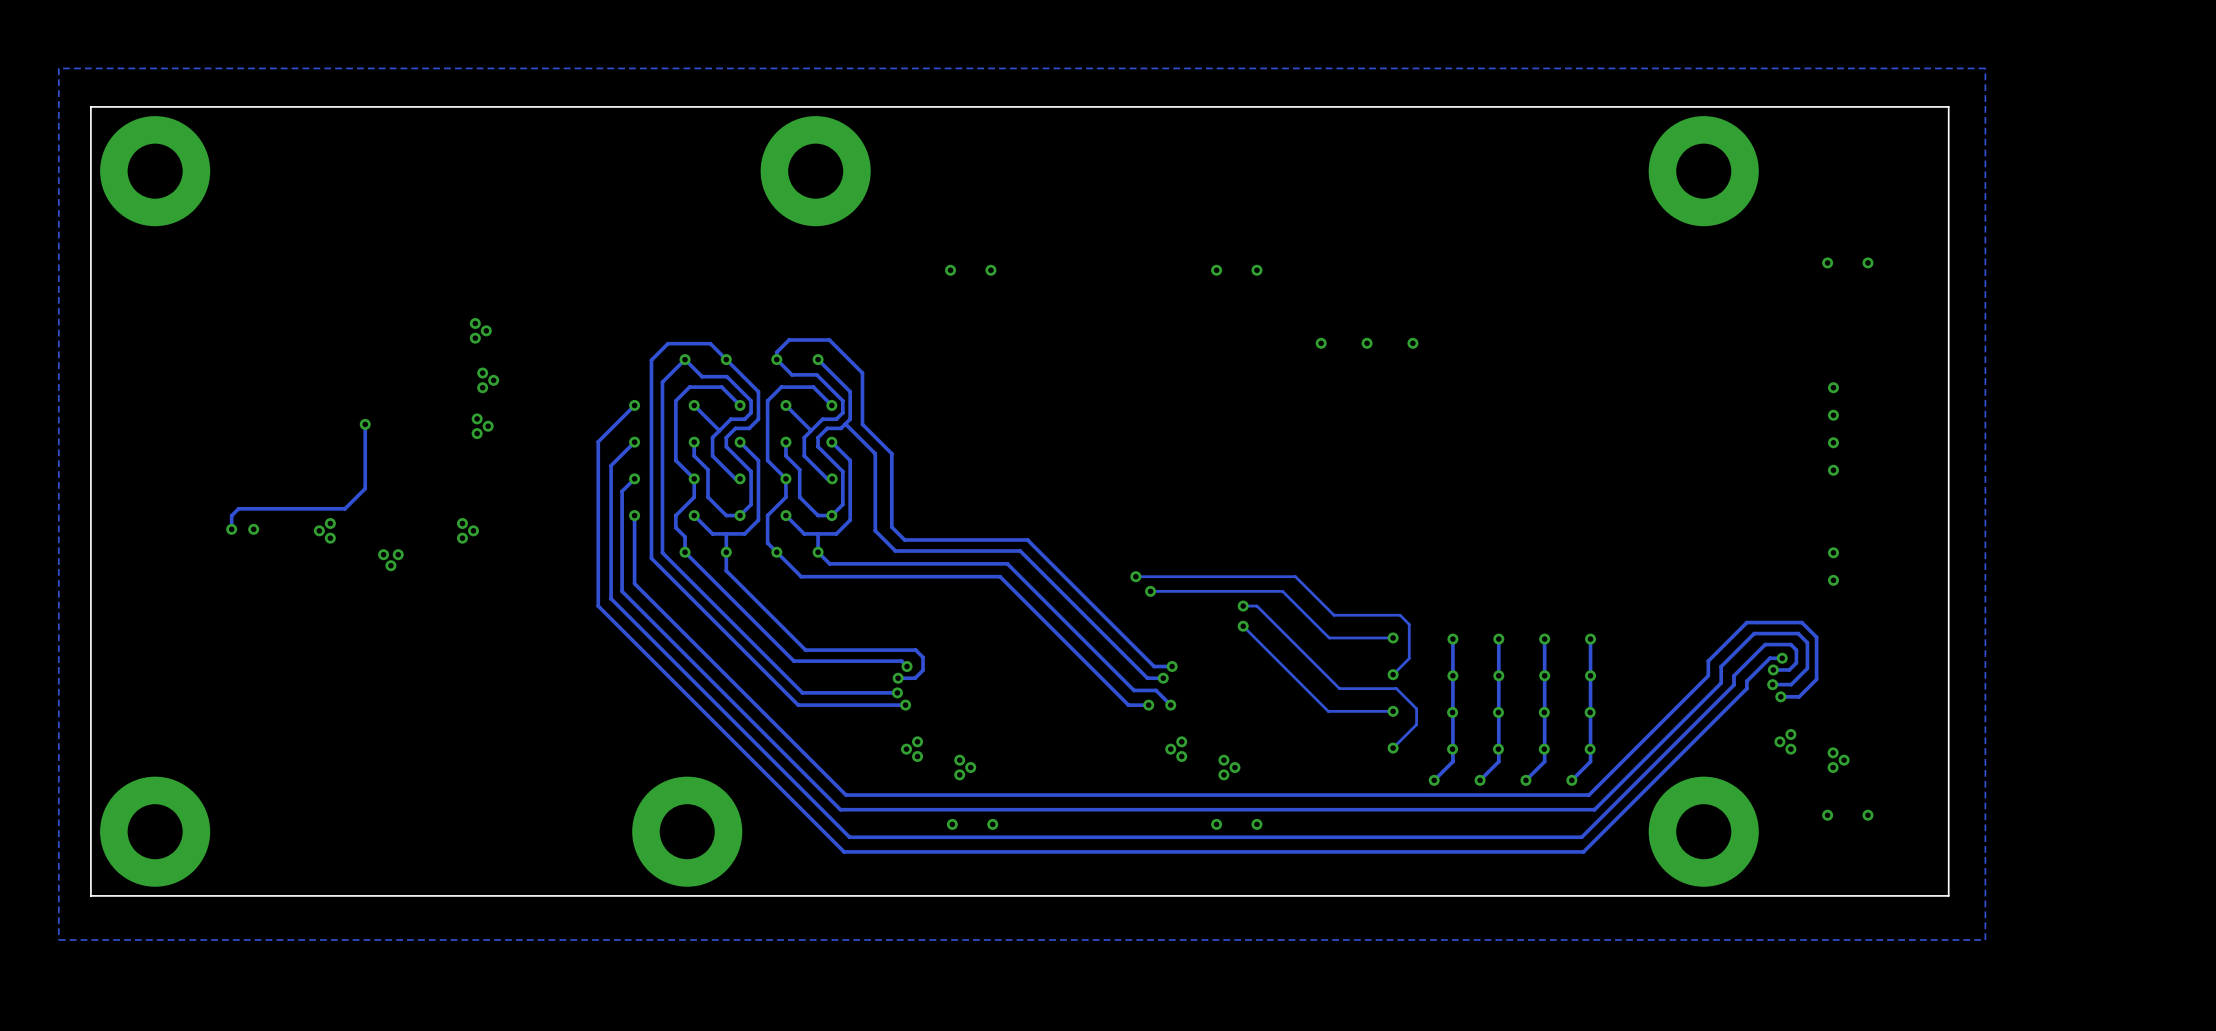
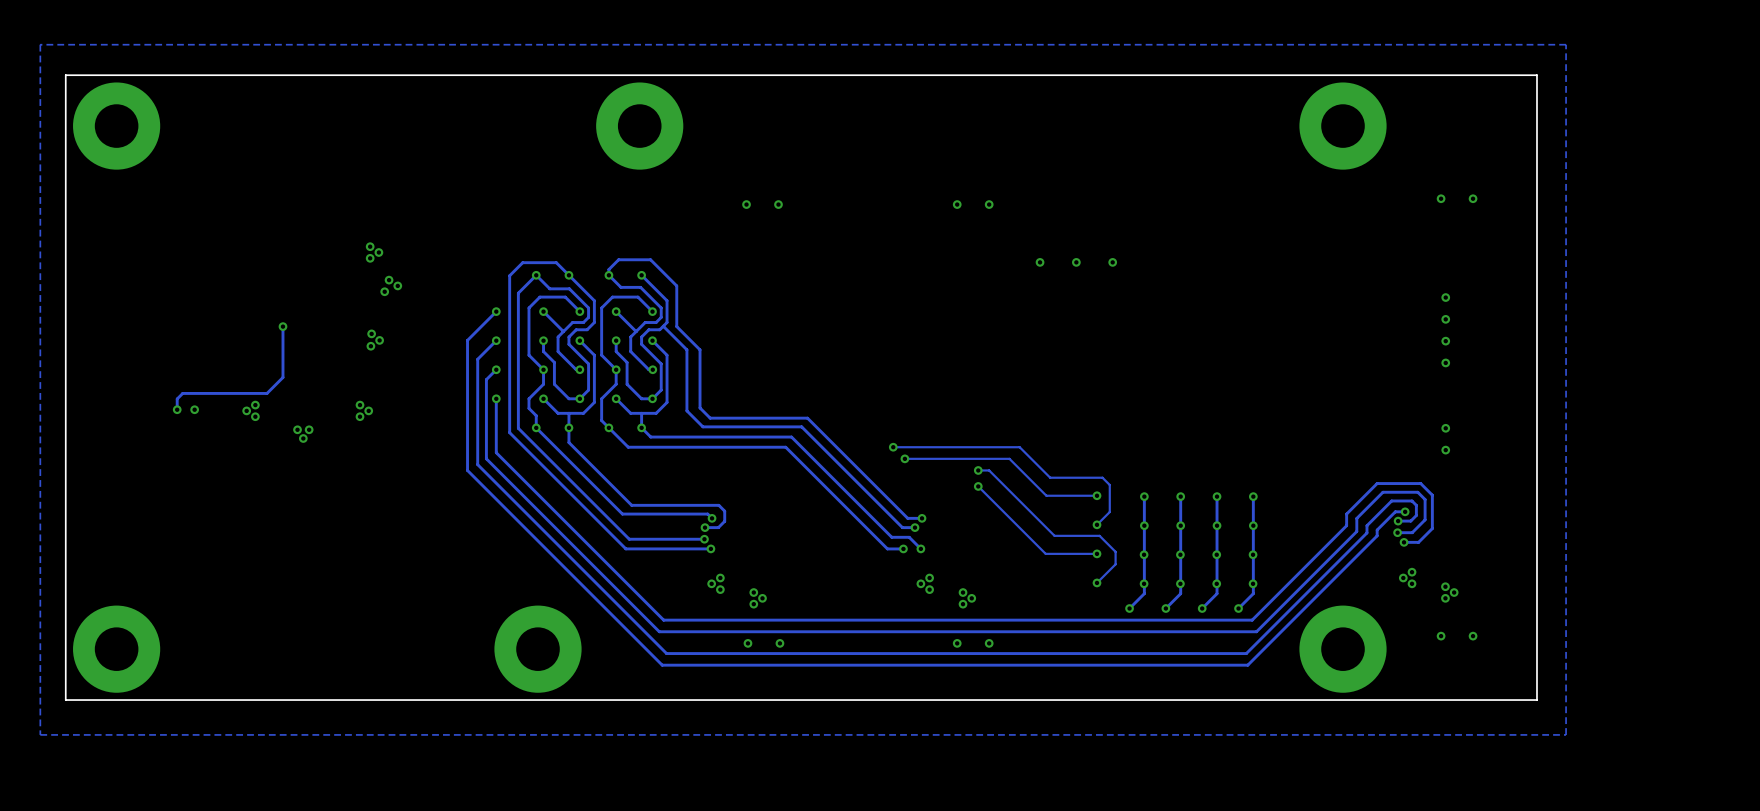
via: none -> (389, 280)
via: (482, 373) -> none
via: none -> (397, 285)
via: (482, 387) -> none
via: (477, 418) -> none
via: (488, 426) -> none
via: none -> (379, 340)
via: none -> (370, 346)

